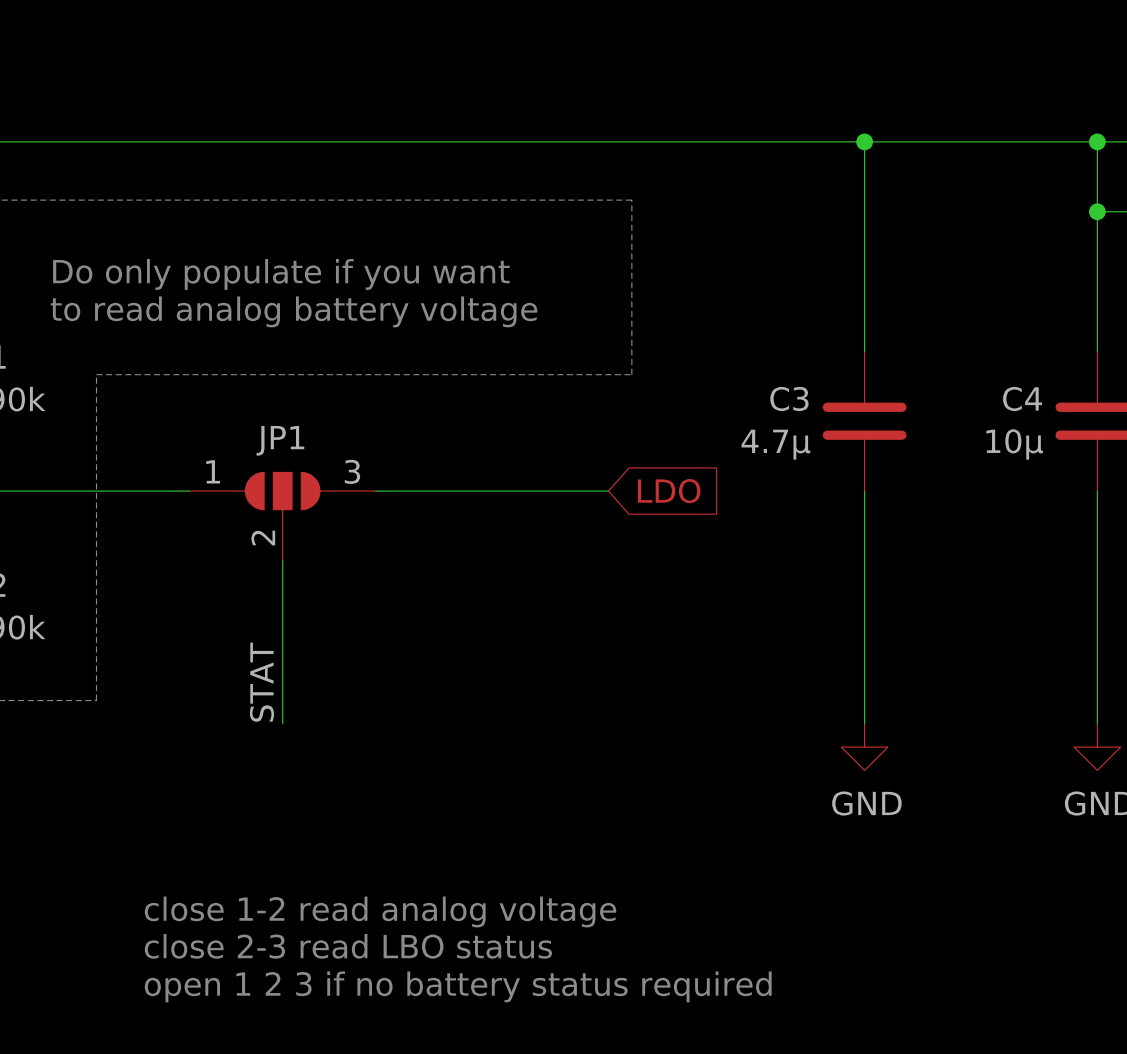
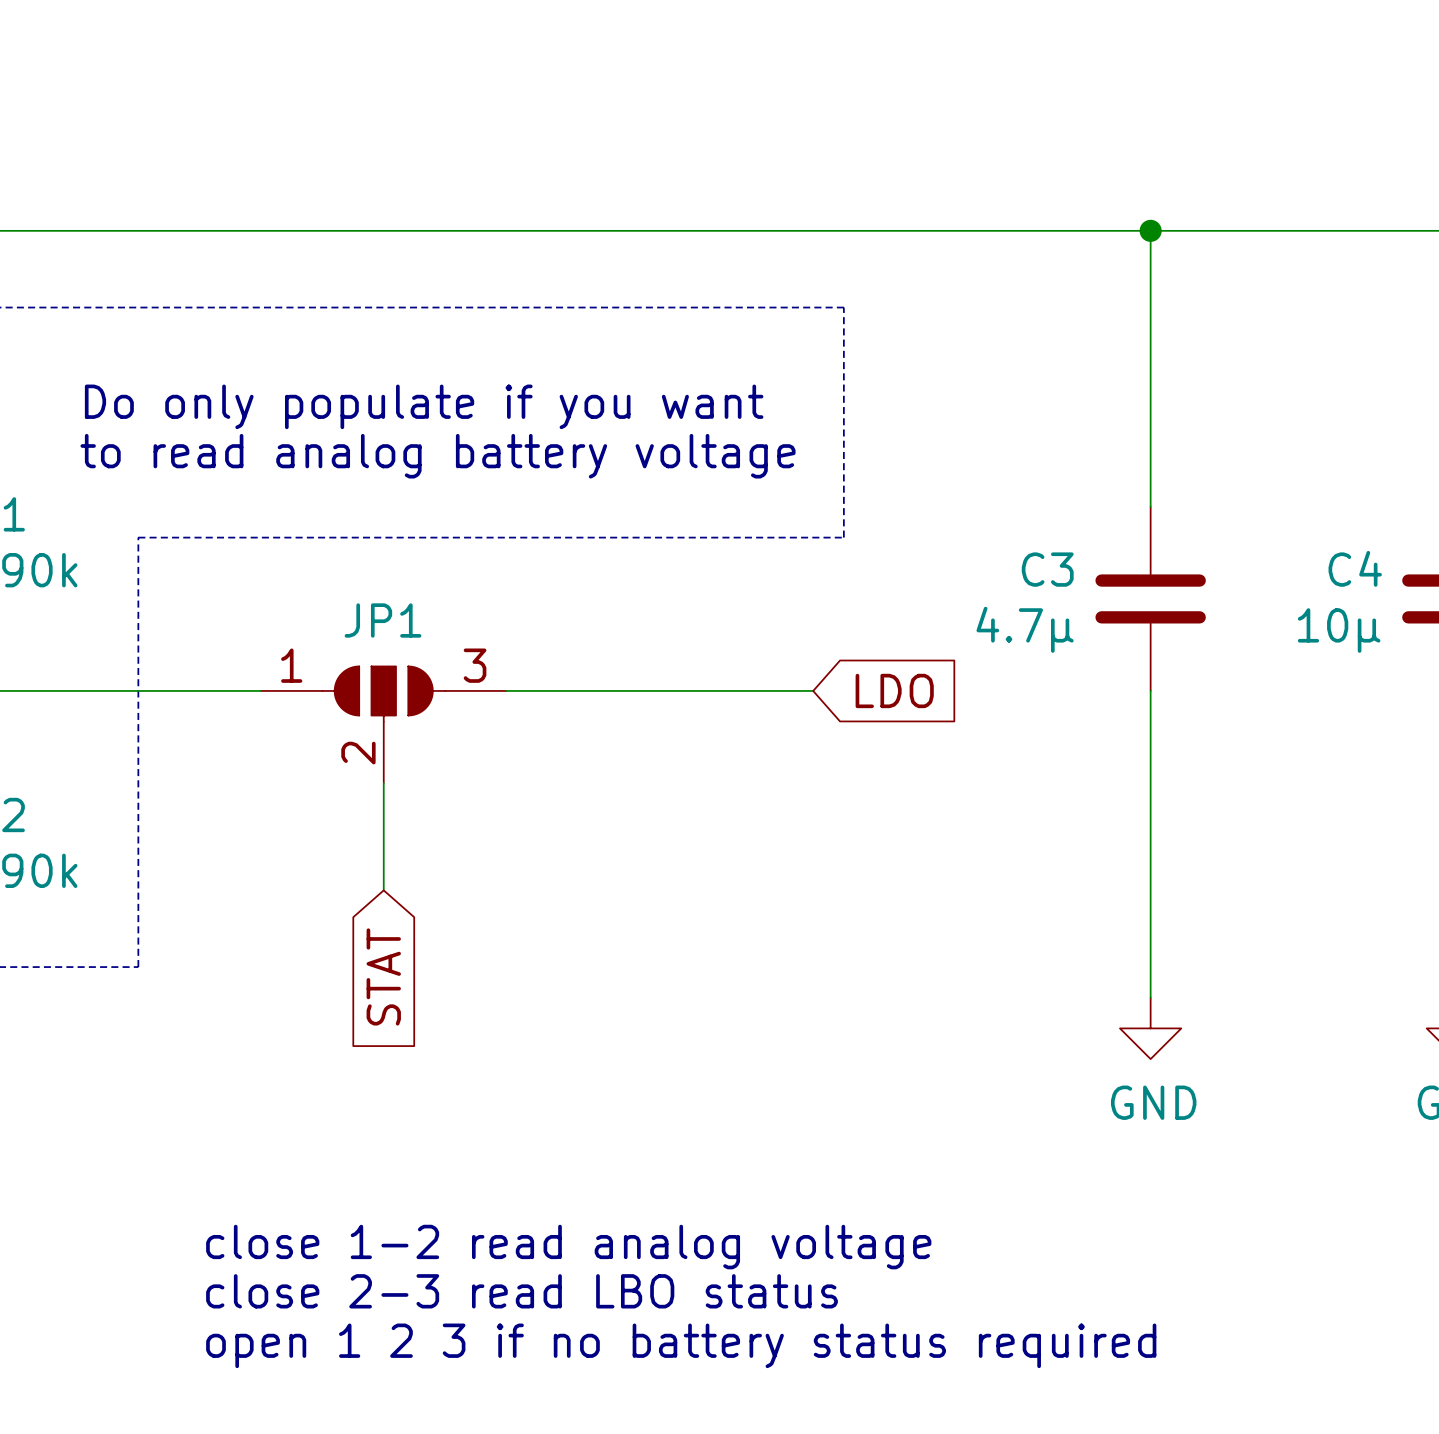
wire: (282, 642) (282, 723) -> none
label: STAT (261, 682) -> none
global label: none -> STAT (383, 976)

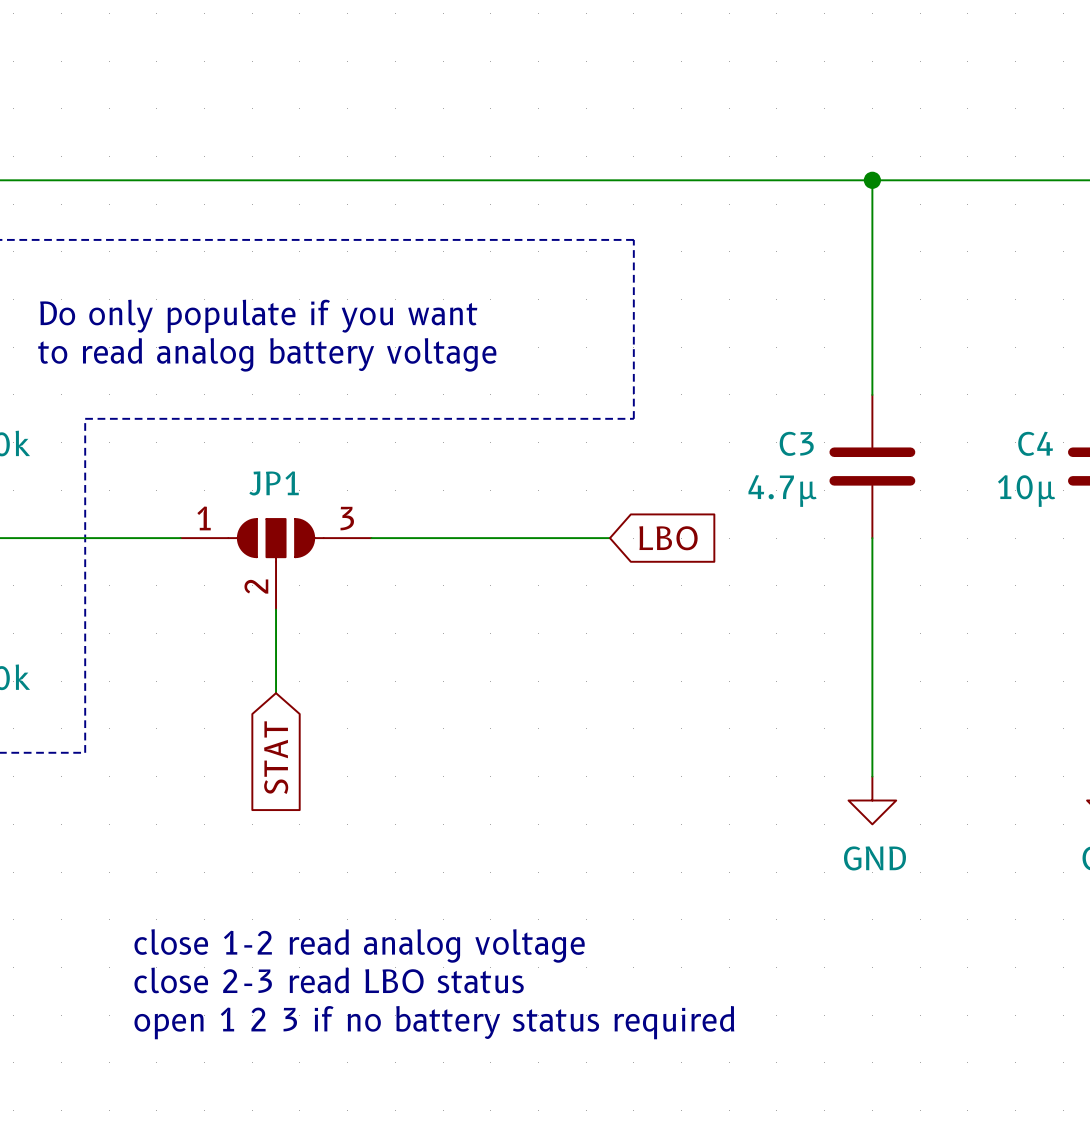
global label: LDO (894, 690) -> LBO (668, 538)
text position: close 1-2 read analog voltage (568, 1247) -> close 1-2 read analog voltage (359, 945)
text position: close 2-3 read LBO status (522, 1291) -> close 2-3 read LBO status (329, 980)
text position: open 1 2 3 if no battery status required (681, 1345) -> open 1 2 3 if no battery status required (434, 1022)

